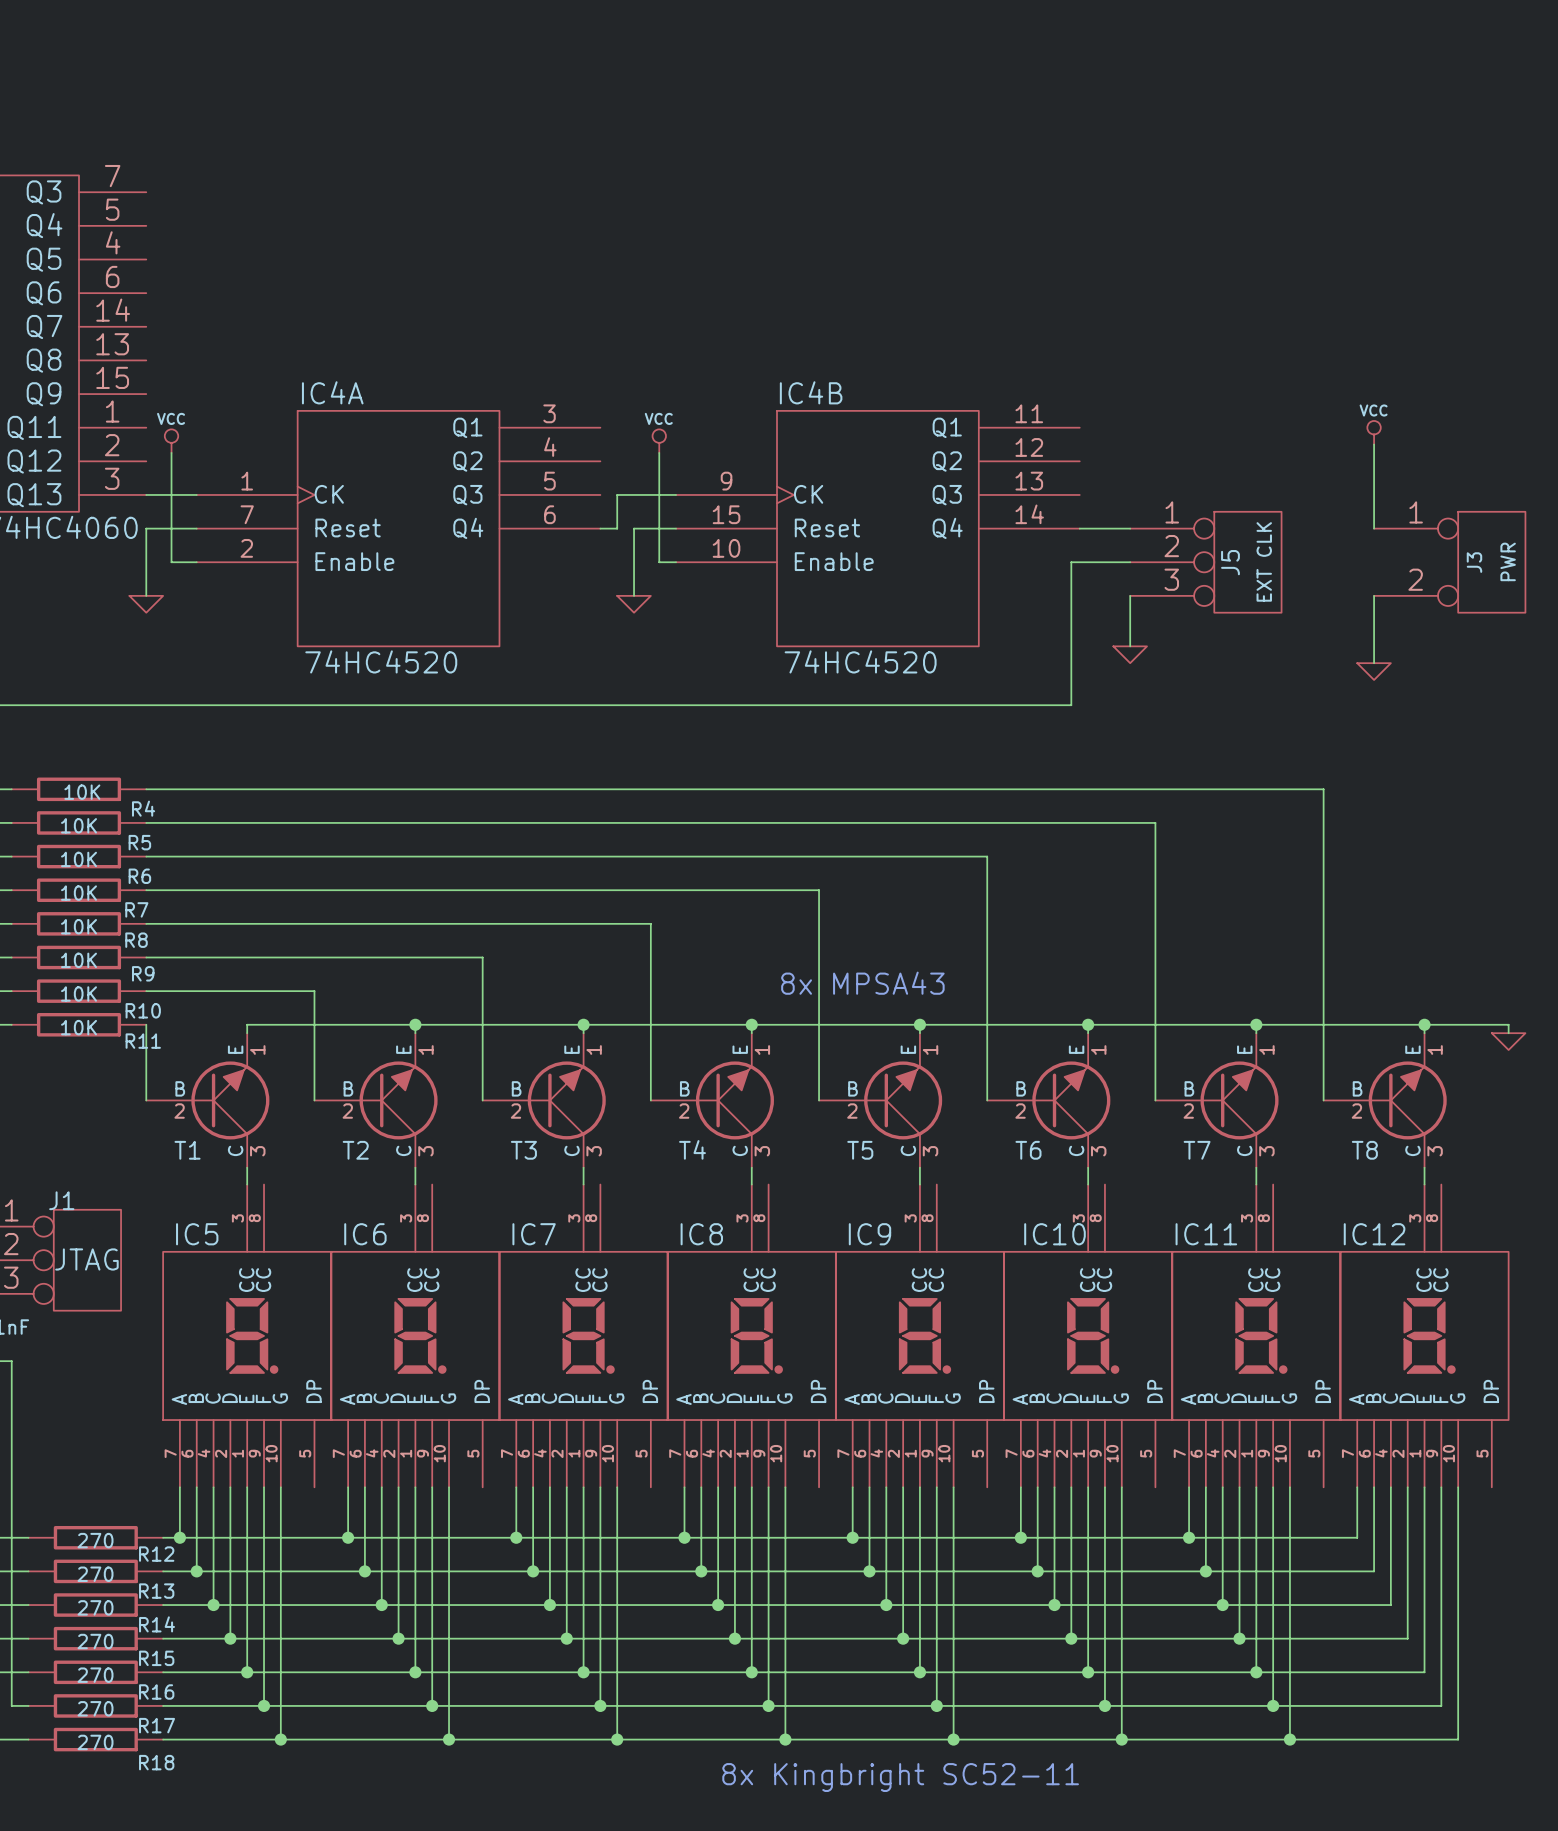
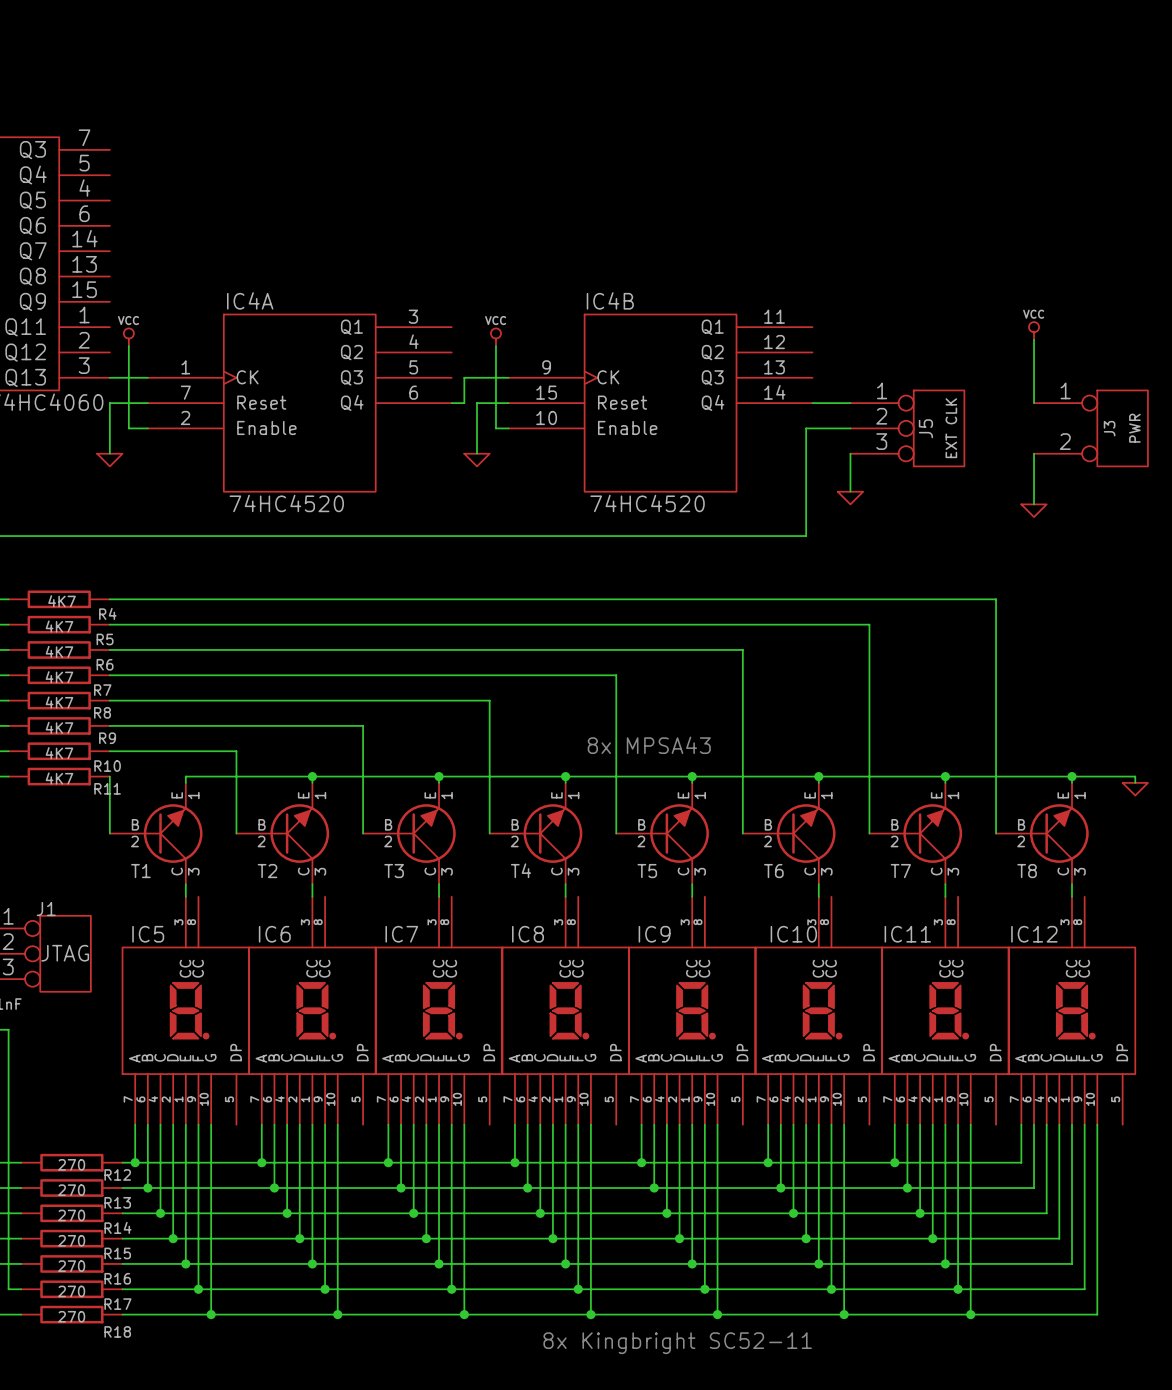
R4 value: 10K (82, 792) -> 4K7 (62, 601)
R5 value: 10K (79, 825) -> 4K7 (59, 626)
R6 value: 10K (79, 859) -> 4K7 (59, 651)
R7 value: 10K (79, 893) -> 4K7 (59, 677)
R8 value: 10K (79, 926) -> 4K7 (59, 702)
R9 value: 10K (79, 960) -> 4K7 (59, 727)
R10 value: 10K (79, 994) -> 4K7 (59, 753)
R11 value: 10K (79, 1027) -> 4K7 (59, 778)

